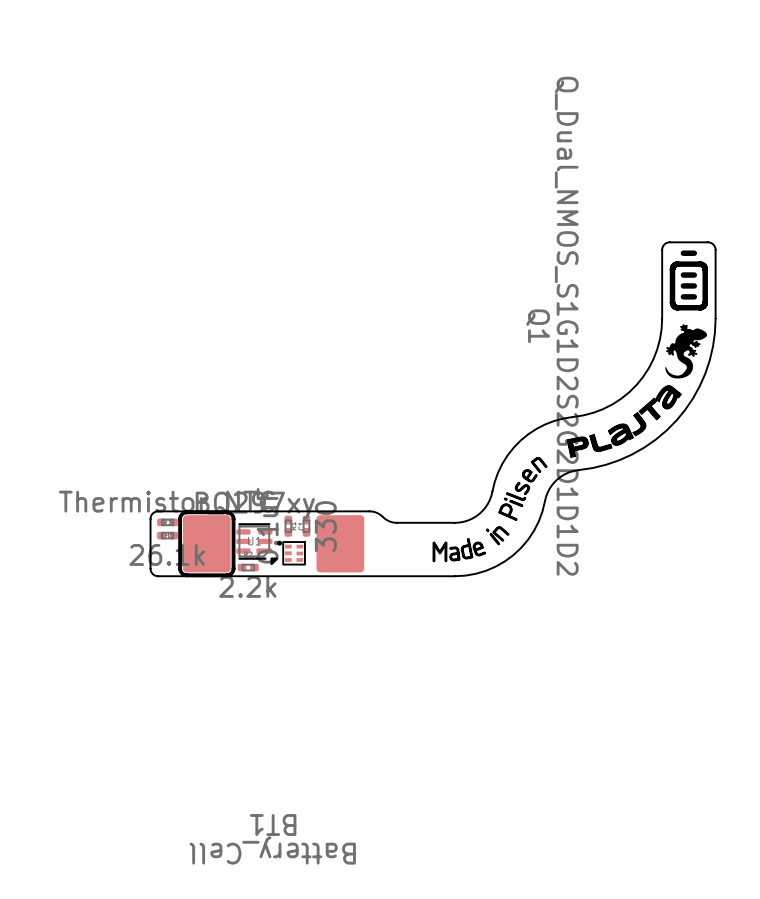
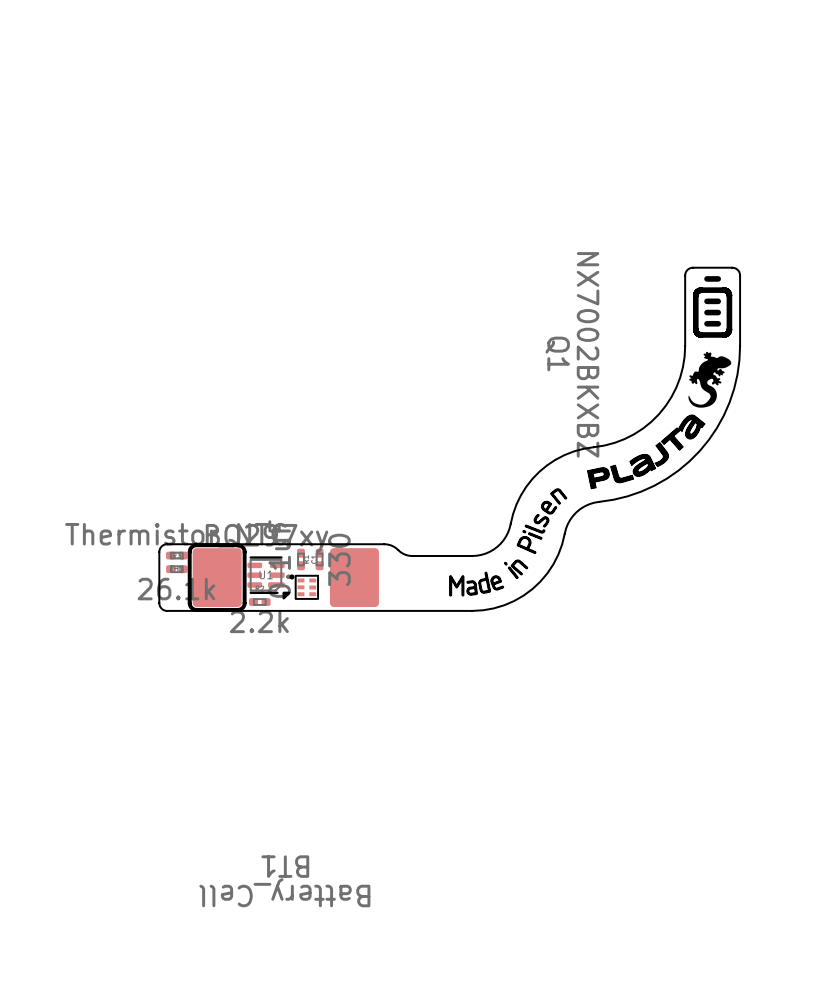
Q1 value: Q_Dual_NMOS_S1G1D2S2G2D1D1D2 (566, 326) -> NX7002BKXBZ (588, 354)

